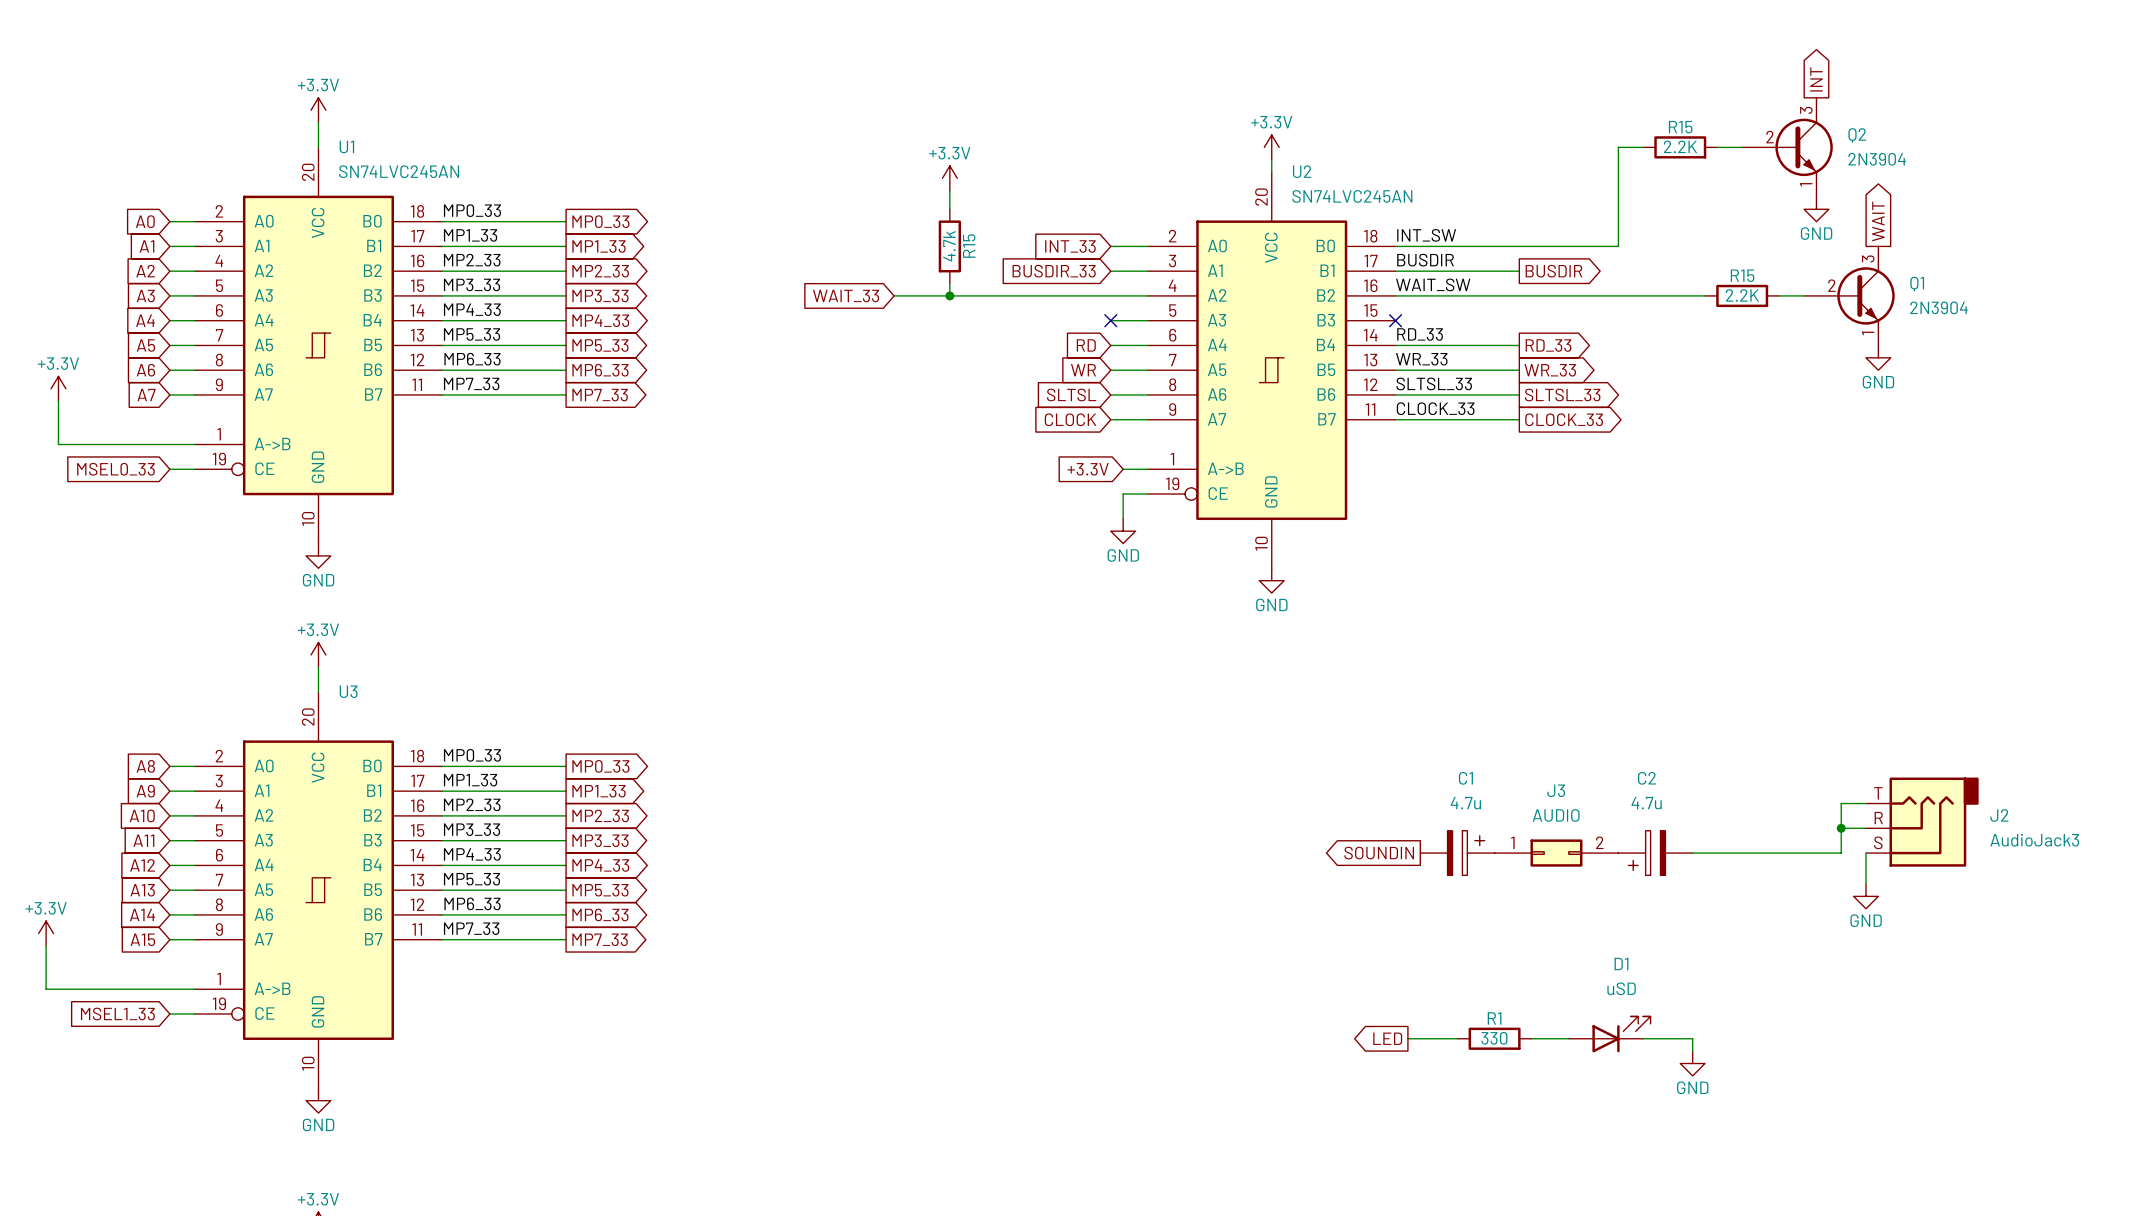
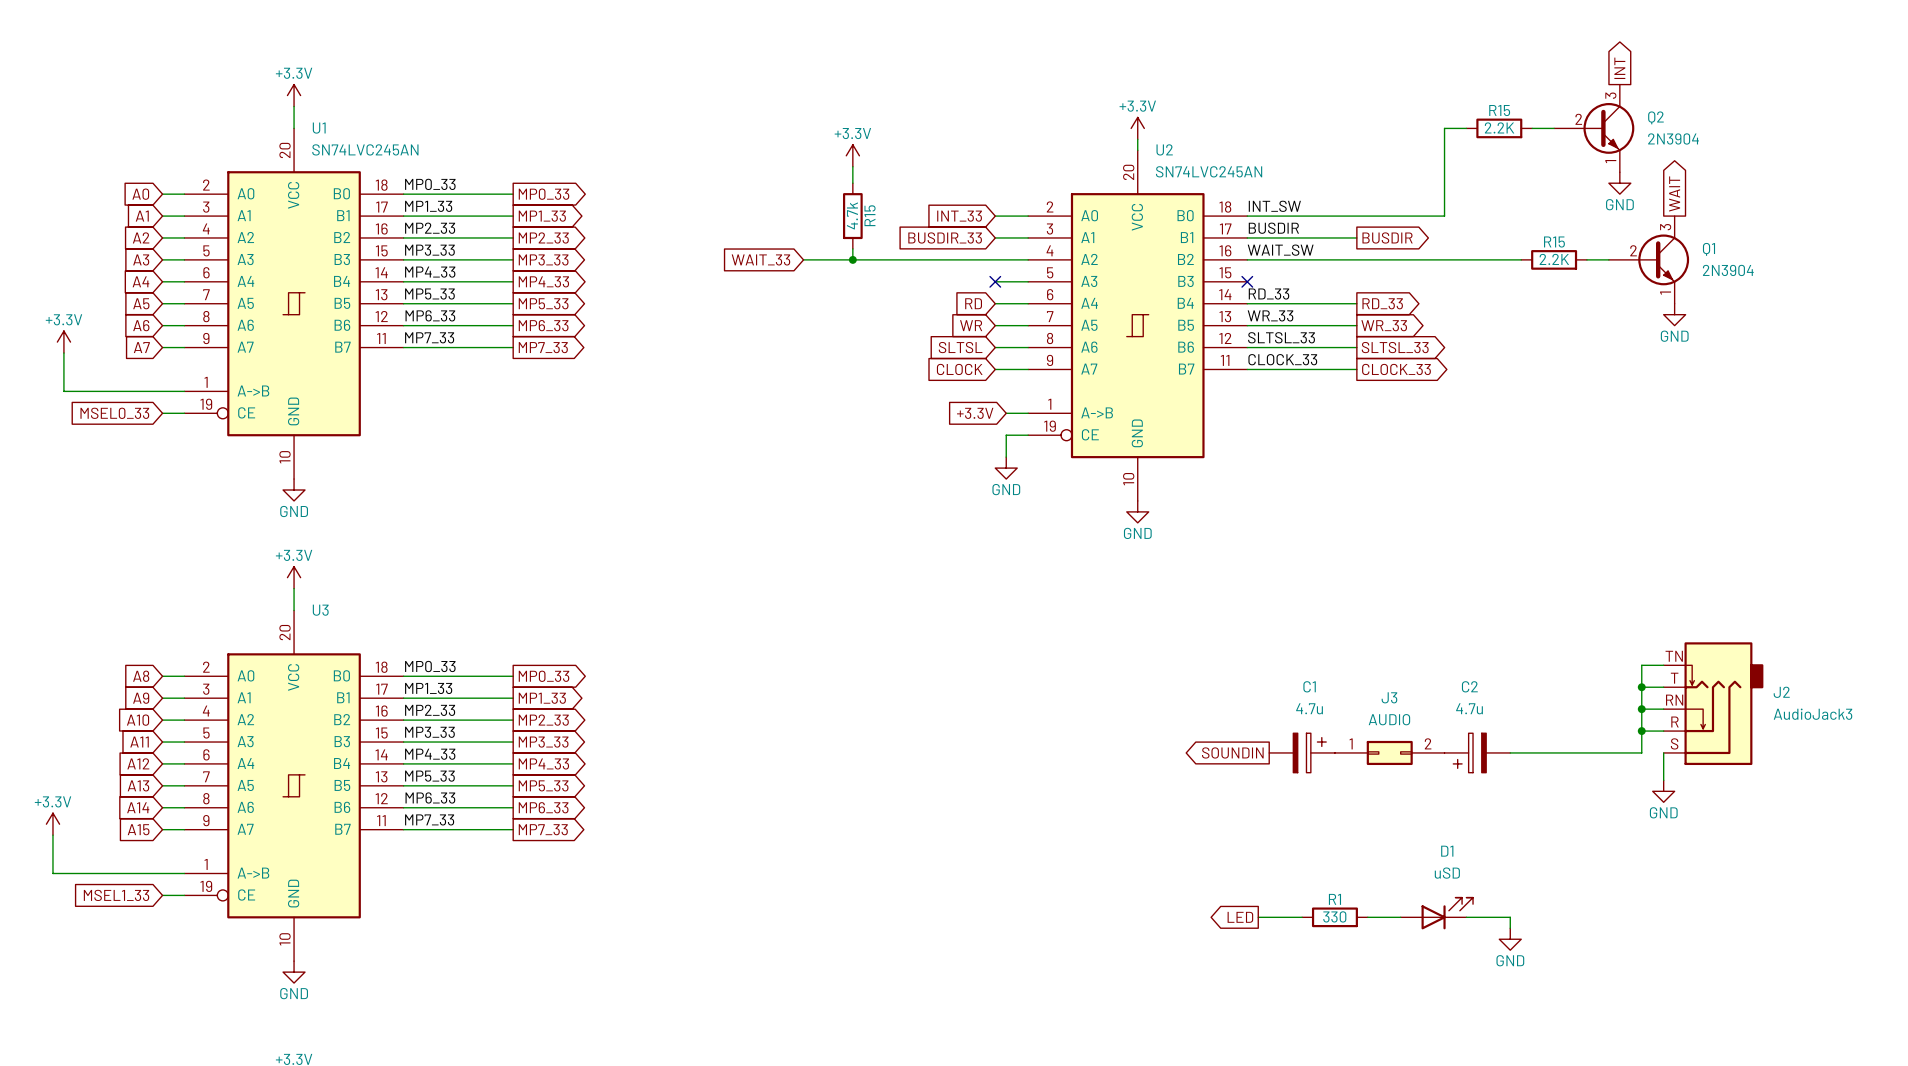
wire: none -> (1663, 665) (1641, 665) (1641, 709)
J2 symbol: [1865, 777, 1979, 867] -> [1663, 642, 1764, 766]
wire: none -> (1641, 687) (1663, 687)
junction: none -> (1641, 687)
junction: none -> (1641, 709)

